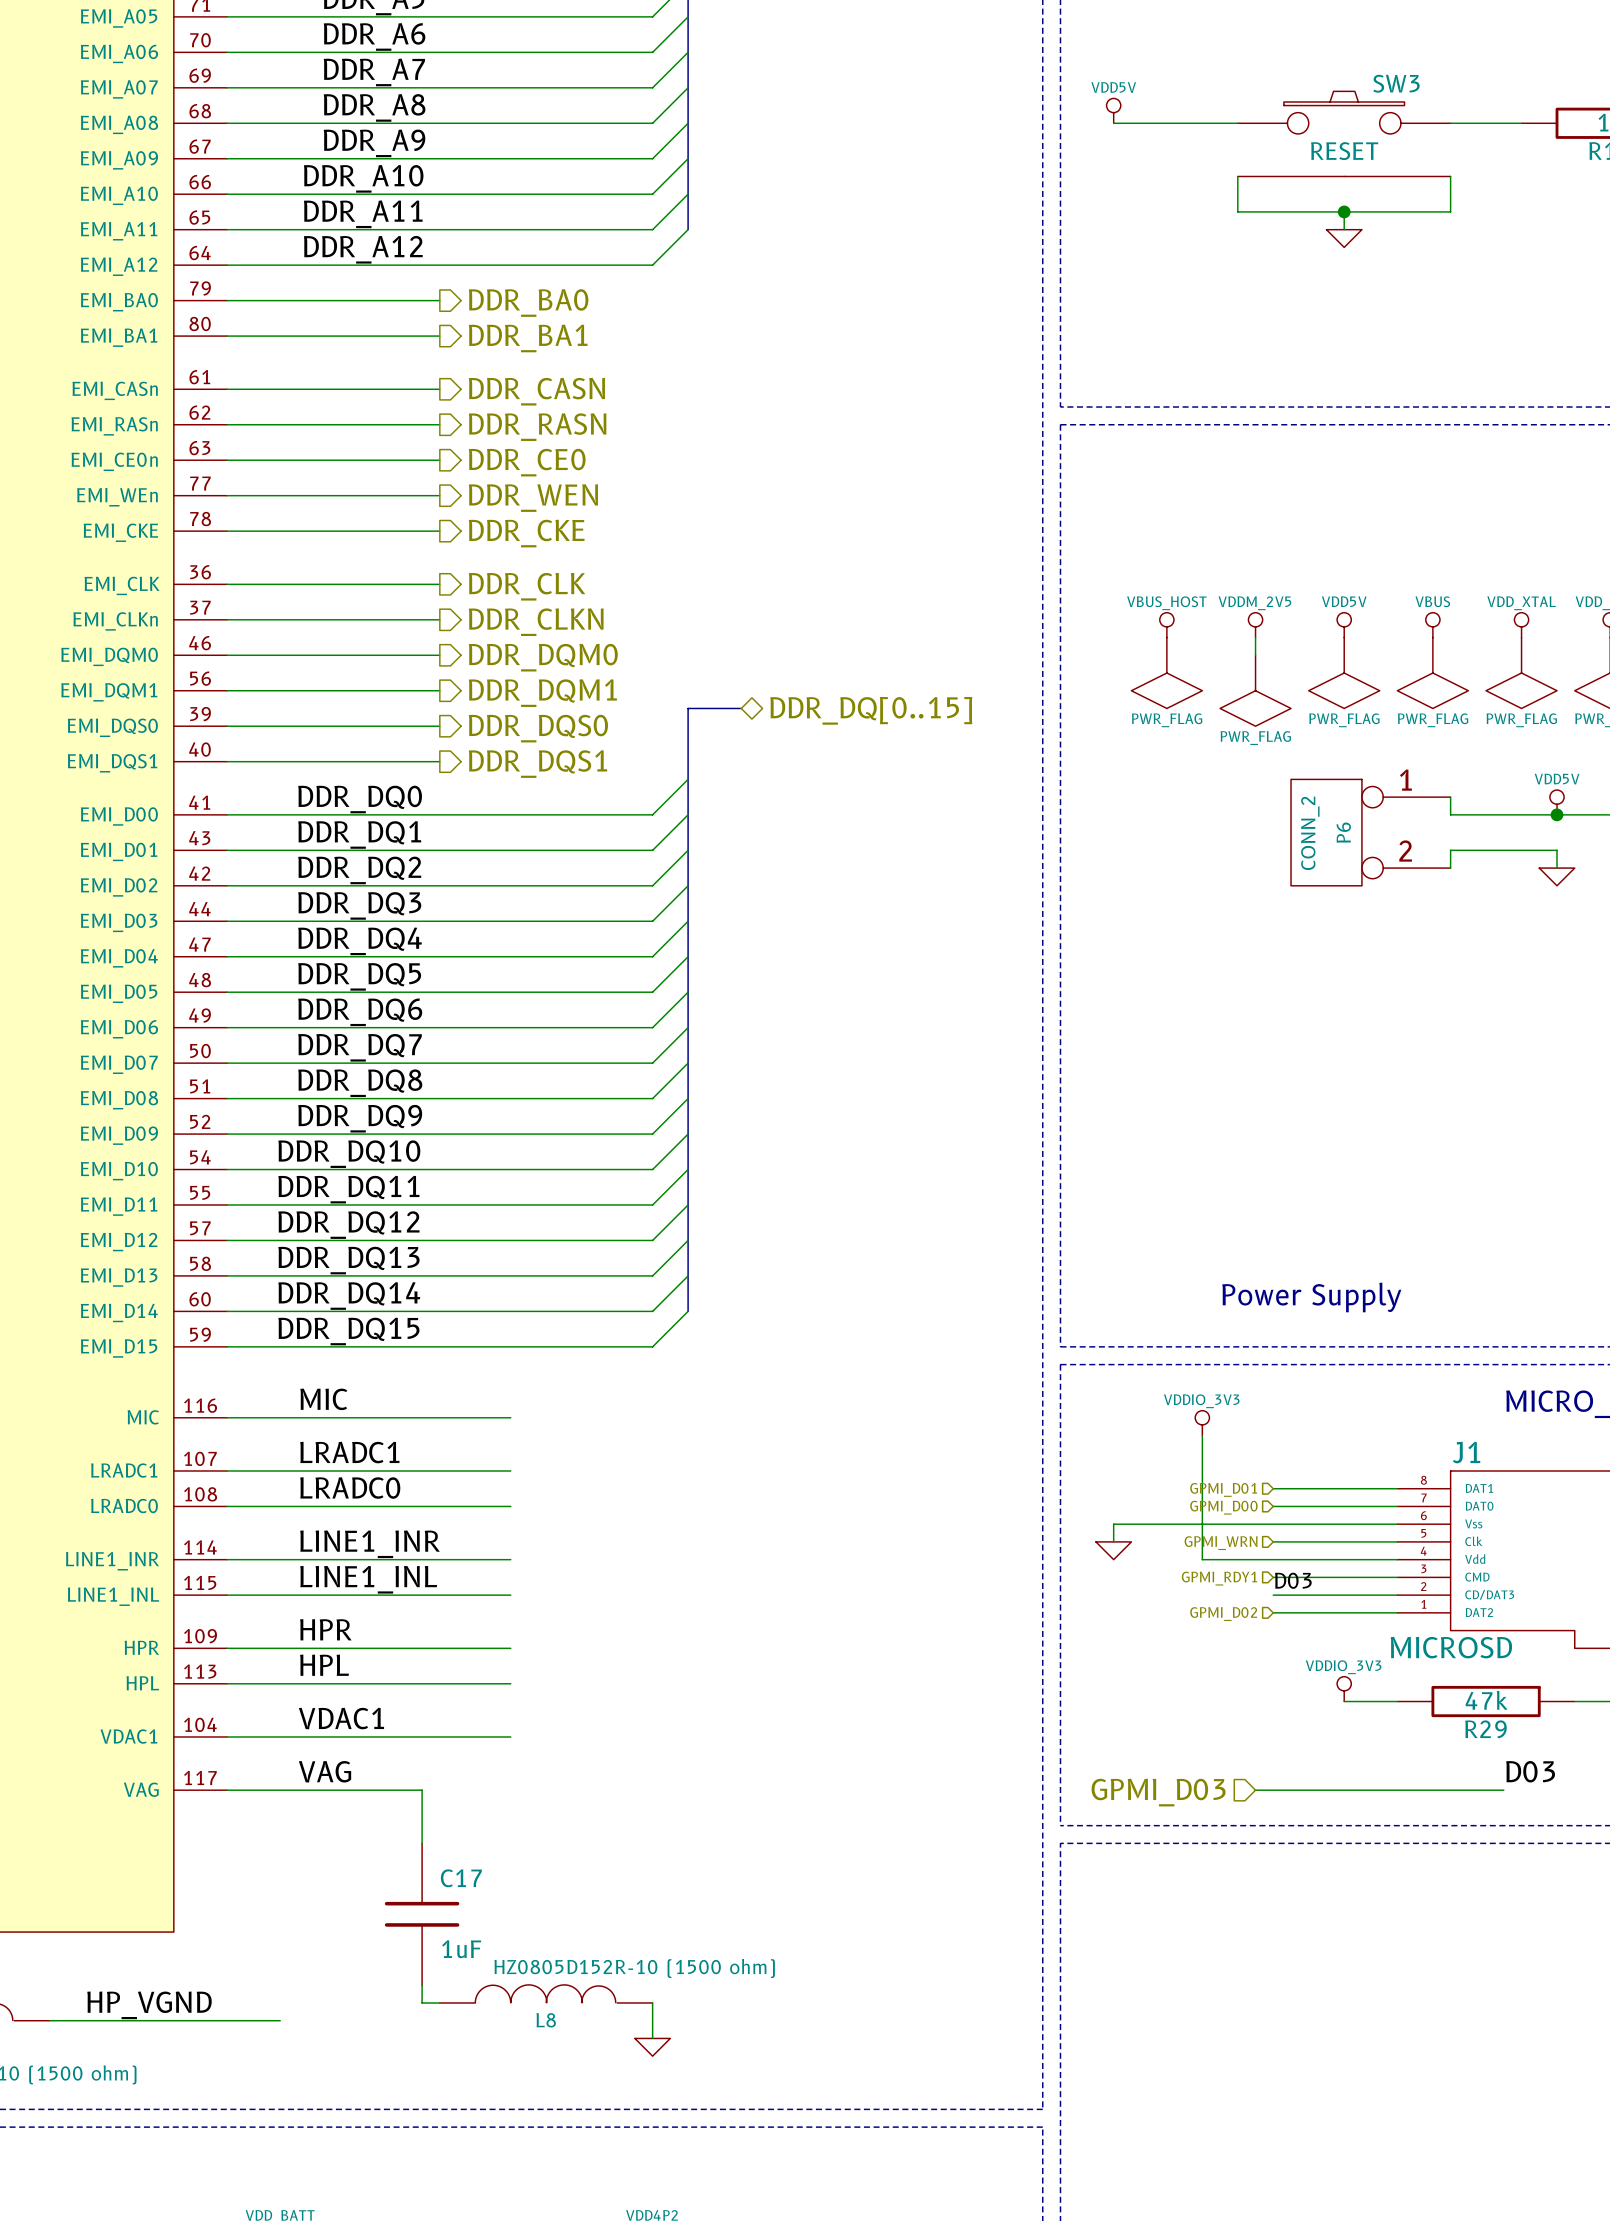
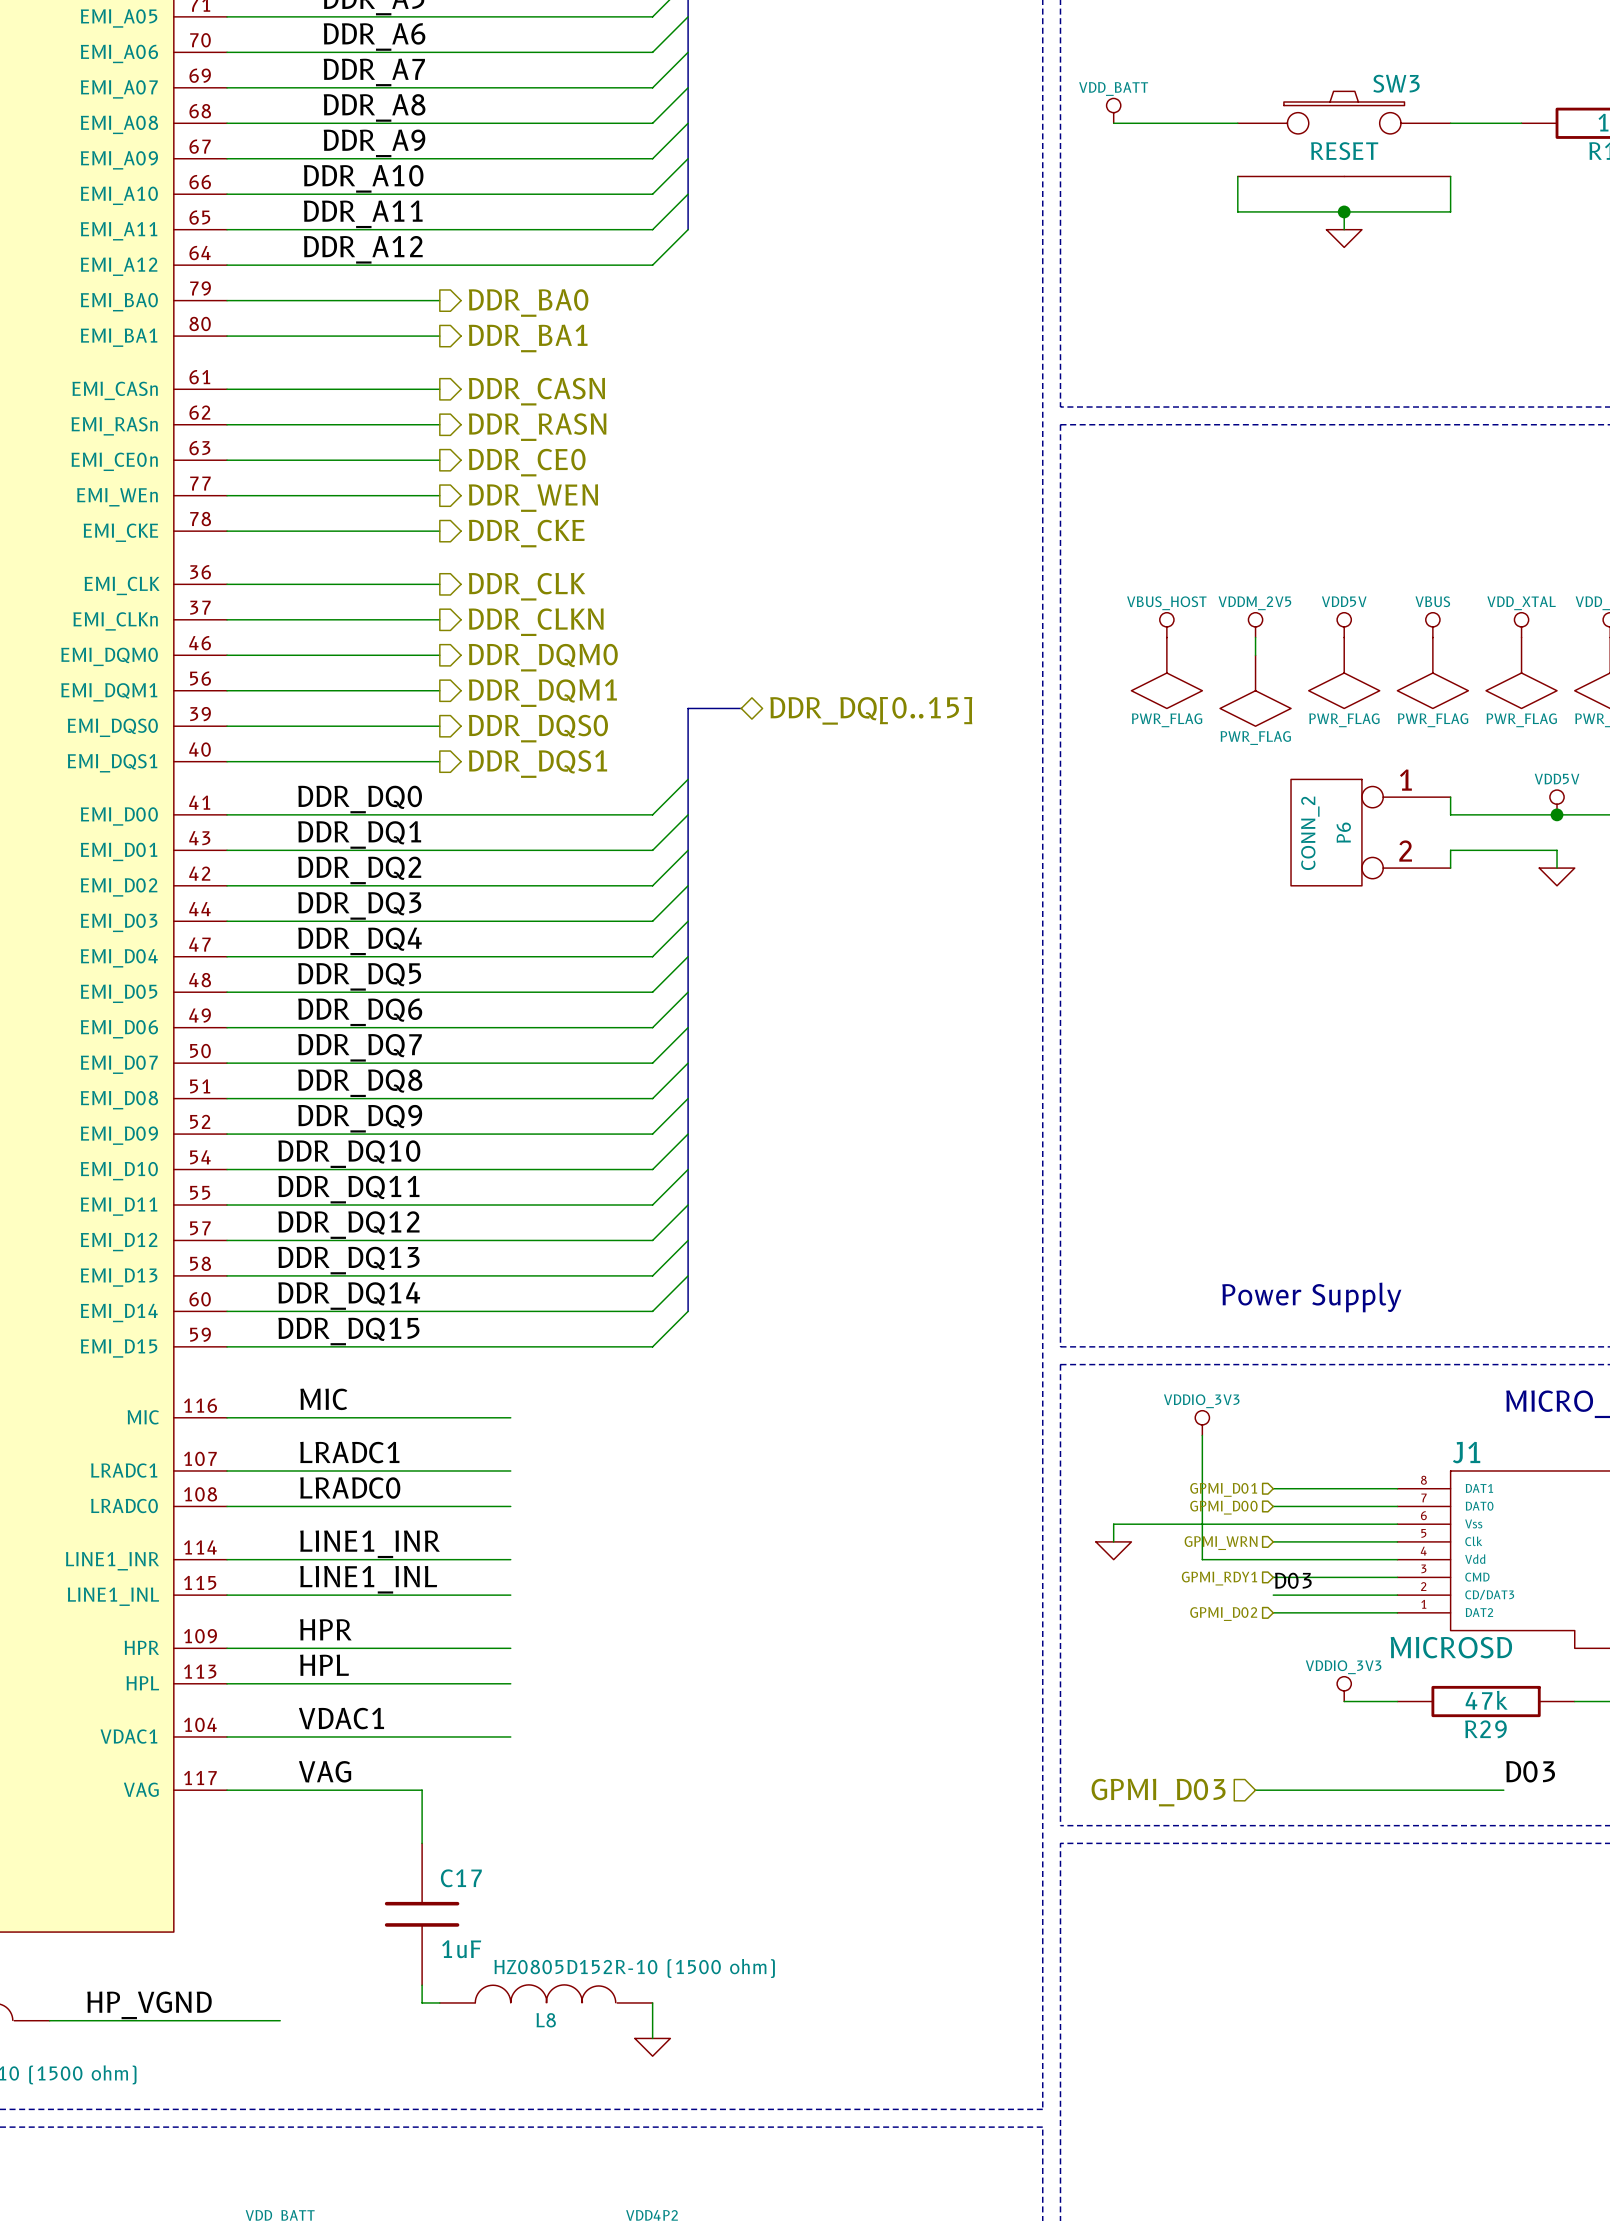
power symbol: VDD5V (1113, 110) -> VDD_BATT (1113, 110)

